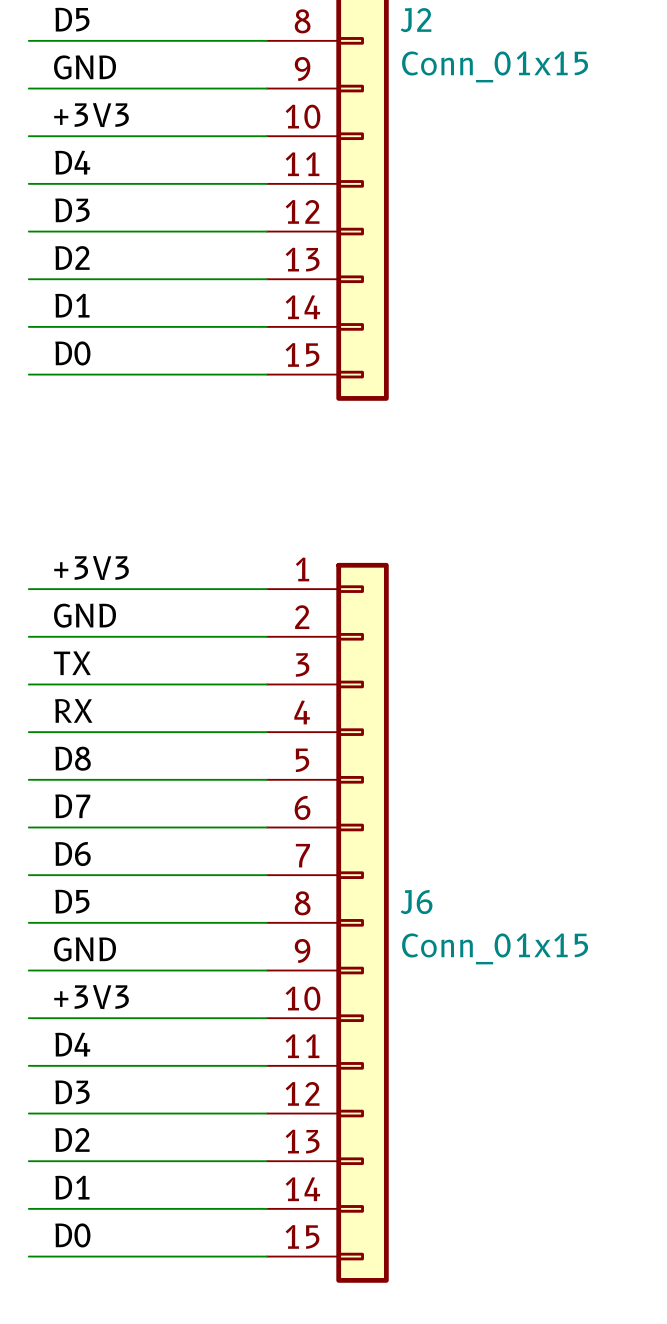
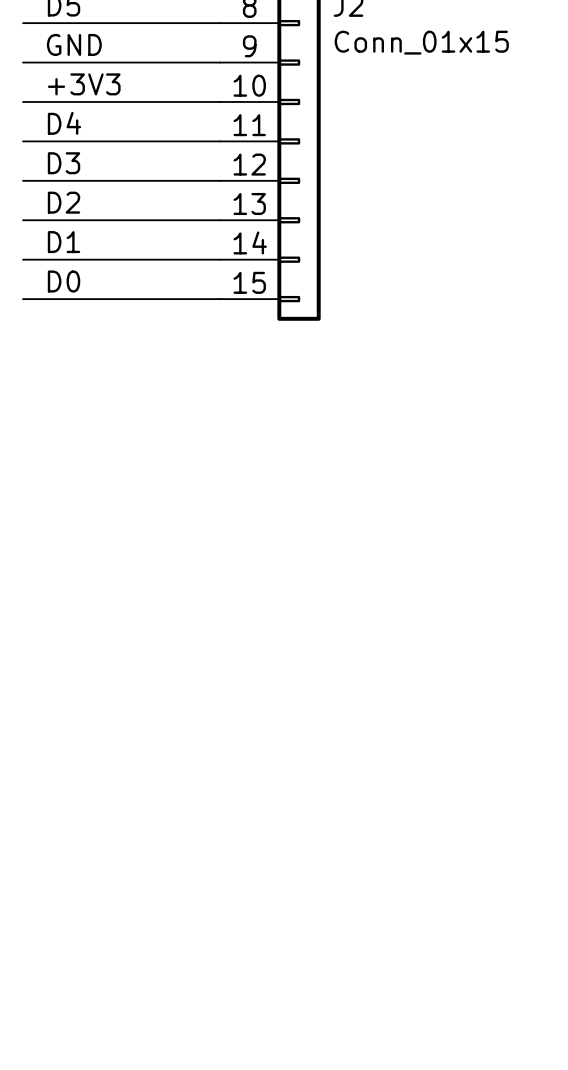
label: +3V3 (91, 568) -> none
wire: (28, 589) (267, 589) -> none
label: GND (85, 615) -> none
wire: (28, 636) (267, 636) -> none
label: TX (72, 663) -> none
wire: (28, 684) (267, 684) -> none
label: RX (73, 710) -> none
wire: (28, 732) (267, 732) -> none
label: D8 (73, 758) -> none
wire: (28, 779) (267, 779) -> none
label: D7 (72, 806) -> none
wire: (28, 827) (267, 827) -> none
label: D6 (73, 854) -> none
wire: (28, 875) (267, 875) -> none
label: D5 (72, 901) -> none
wire: (28, 922) (267, 922) -> none
J6: Conn_01x15 (327, 922) -> none
label: GND (85, 949) -> none
wire: (28, 970) (267, 970) -> none
label: +3V3 (91, 997) -> none
wire: (28, 1018) (267, 1018) -> none
label: D4 (72, 1044) -> none
wire: (28, 1065) (267, 1065) -> none
label: D3 (72, 1092) -> none
wire: (28, 1113) (267, 1113) -> none
label: D2 (72, 1139) -> none
wire: (28, 1161) (267, 1161) -> none
label: D1 (72, 1187) -> none
wire: (28, 1208) (267, 1208) -> none
label: D0 (72, 1235) -> none
wire: (28, 1256) (267, 1256) -> none

